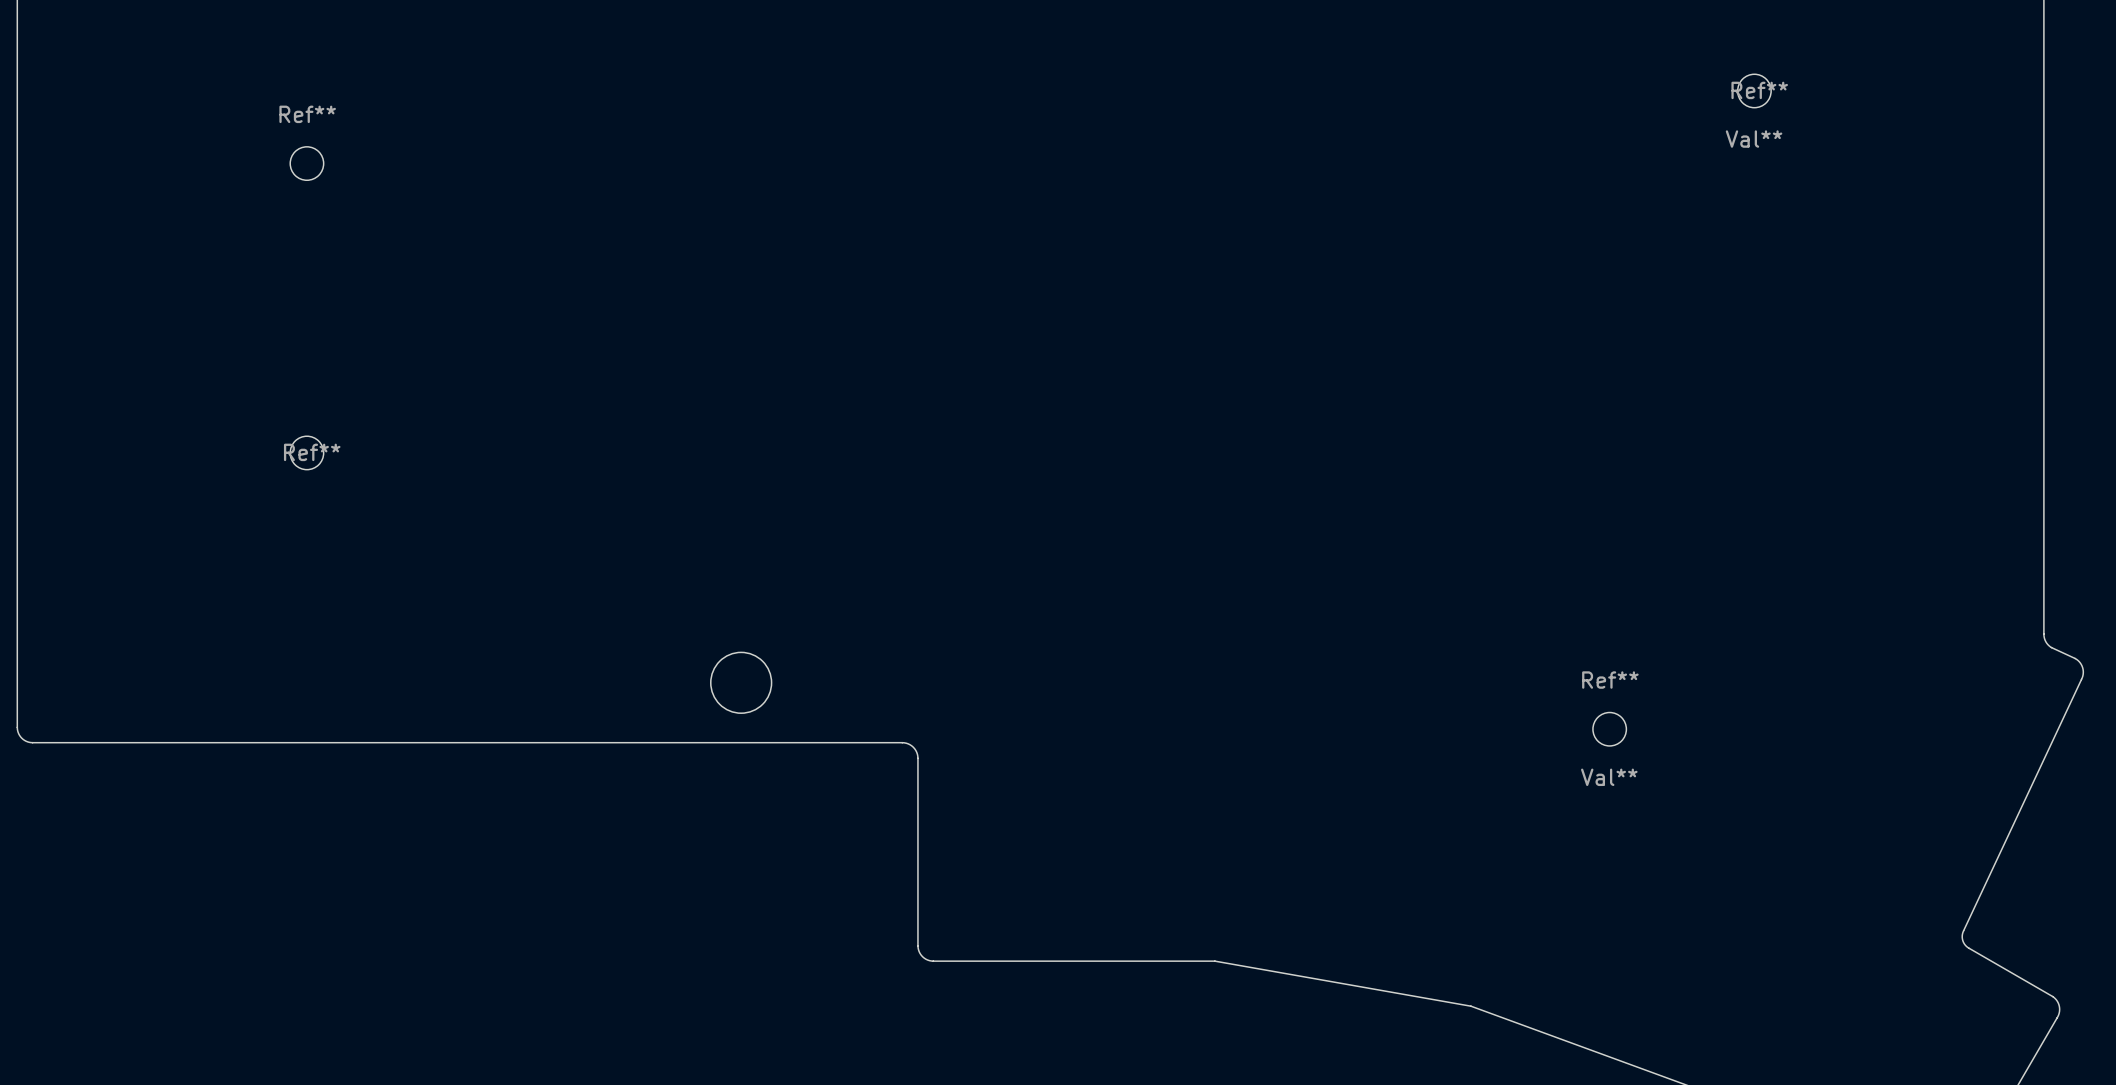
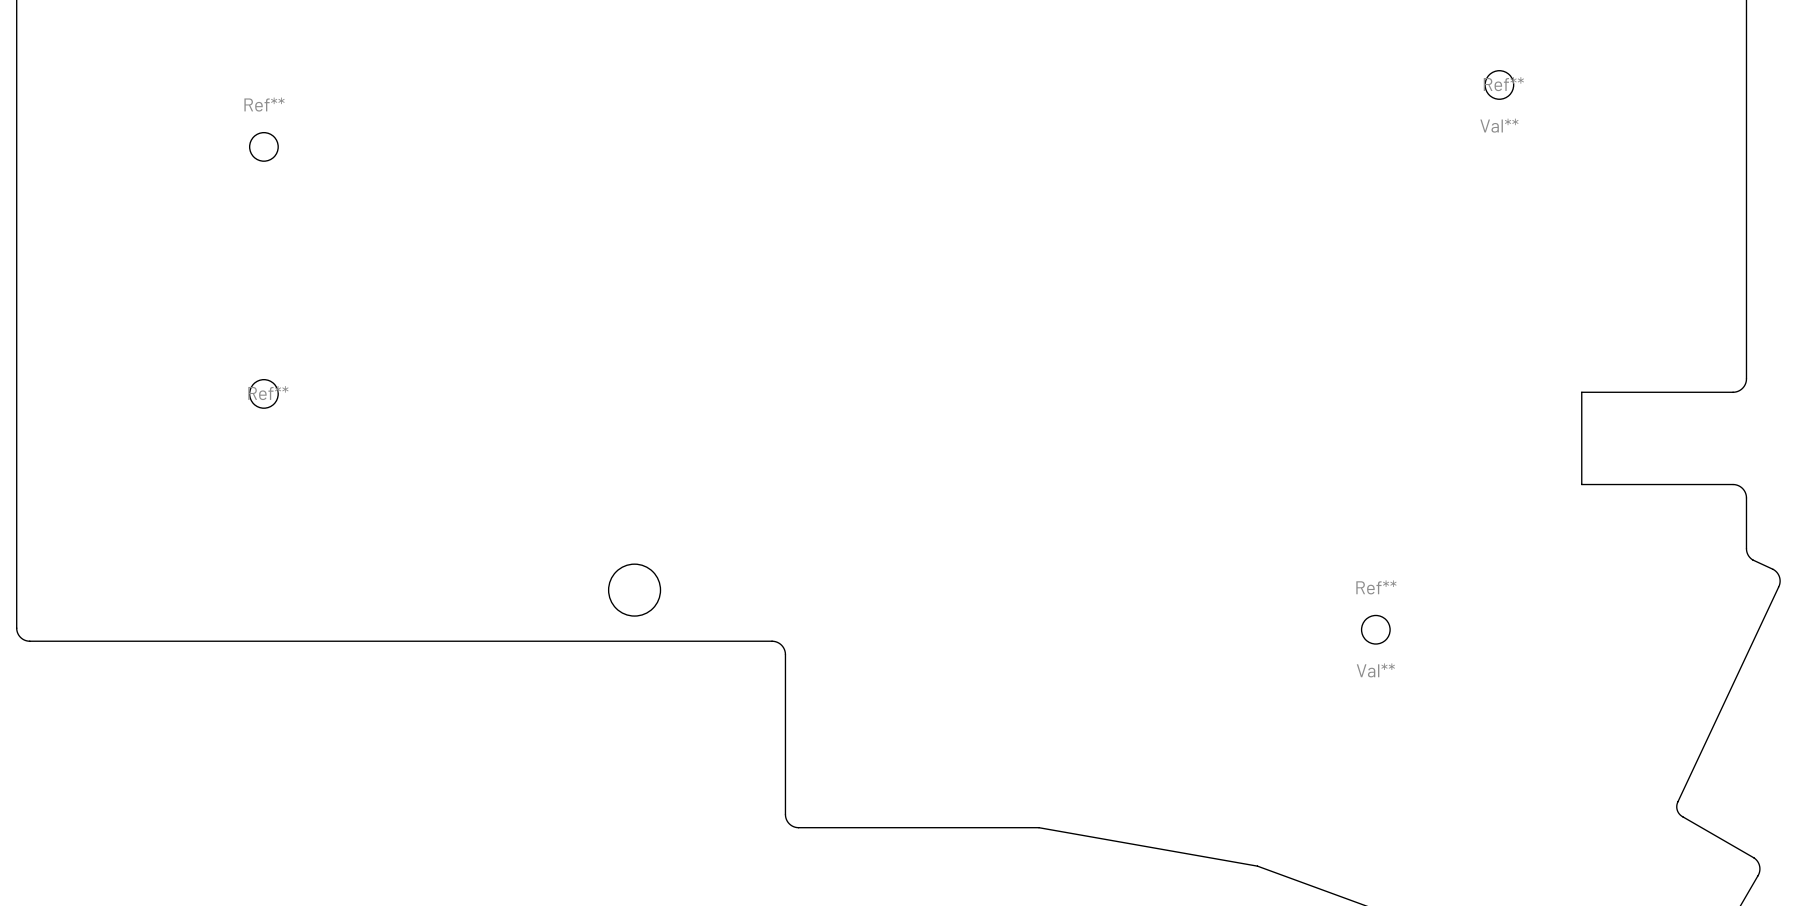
board edge: (2043, 435) (2043, 574) -> (1746, 378) (1743, 387) (1734, 392) (1581, 392) (1581, 484) (1734, 484) (1743, 489) (1746, 497)

